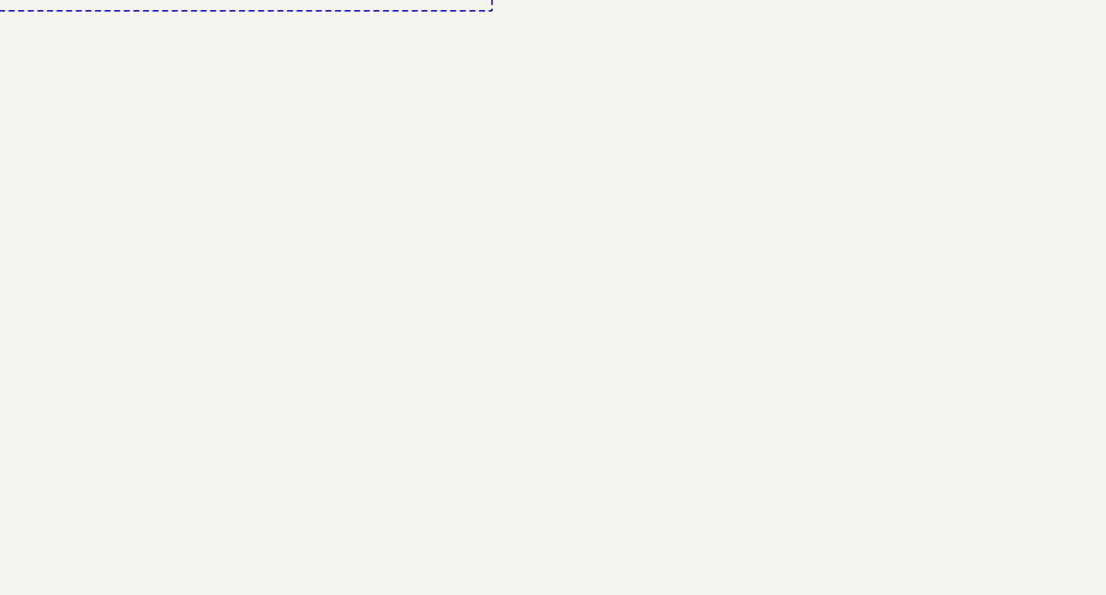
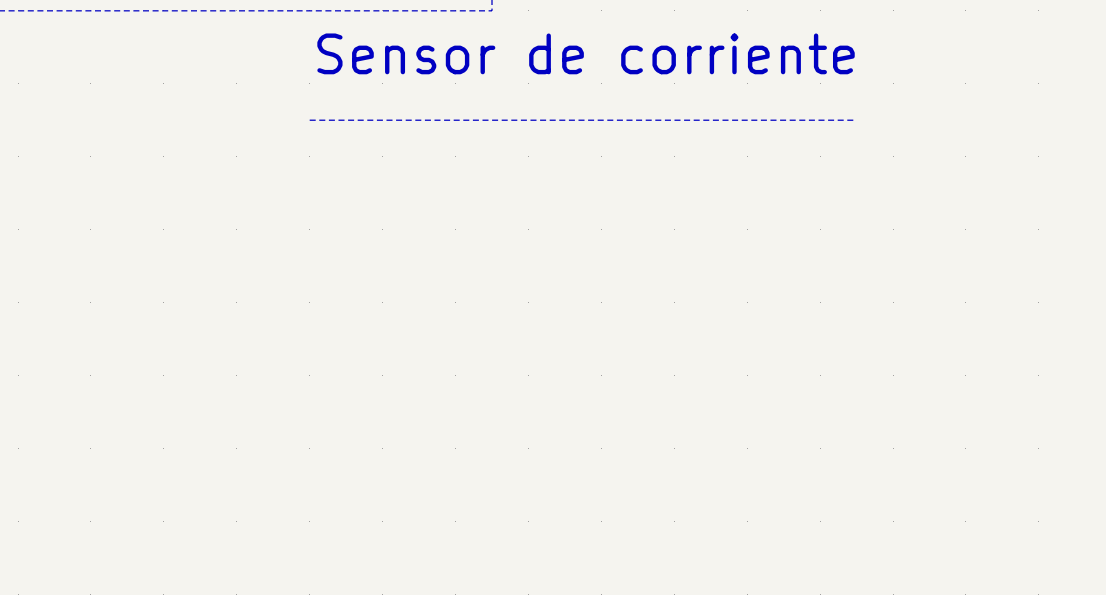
text: none -> Sensor de corriente (586, 53)
line: none -> (309, 120) (856, 120)

